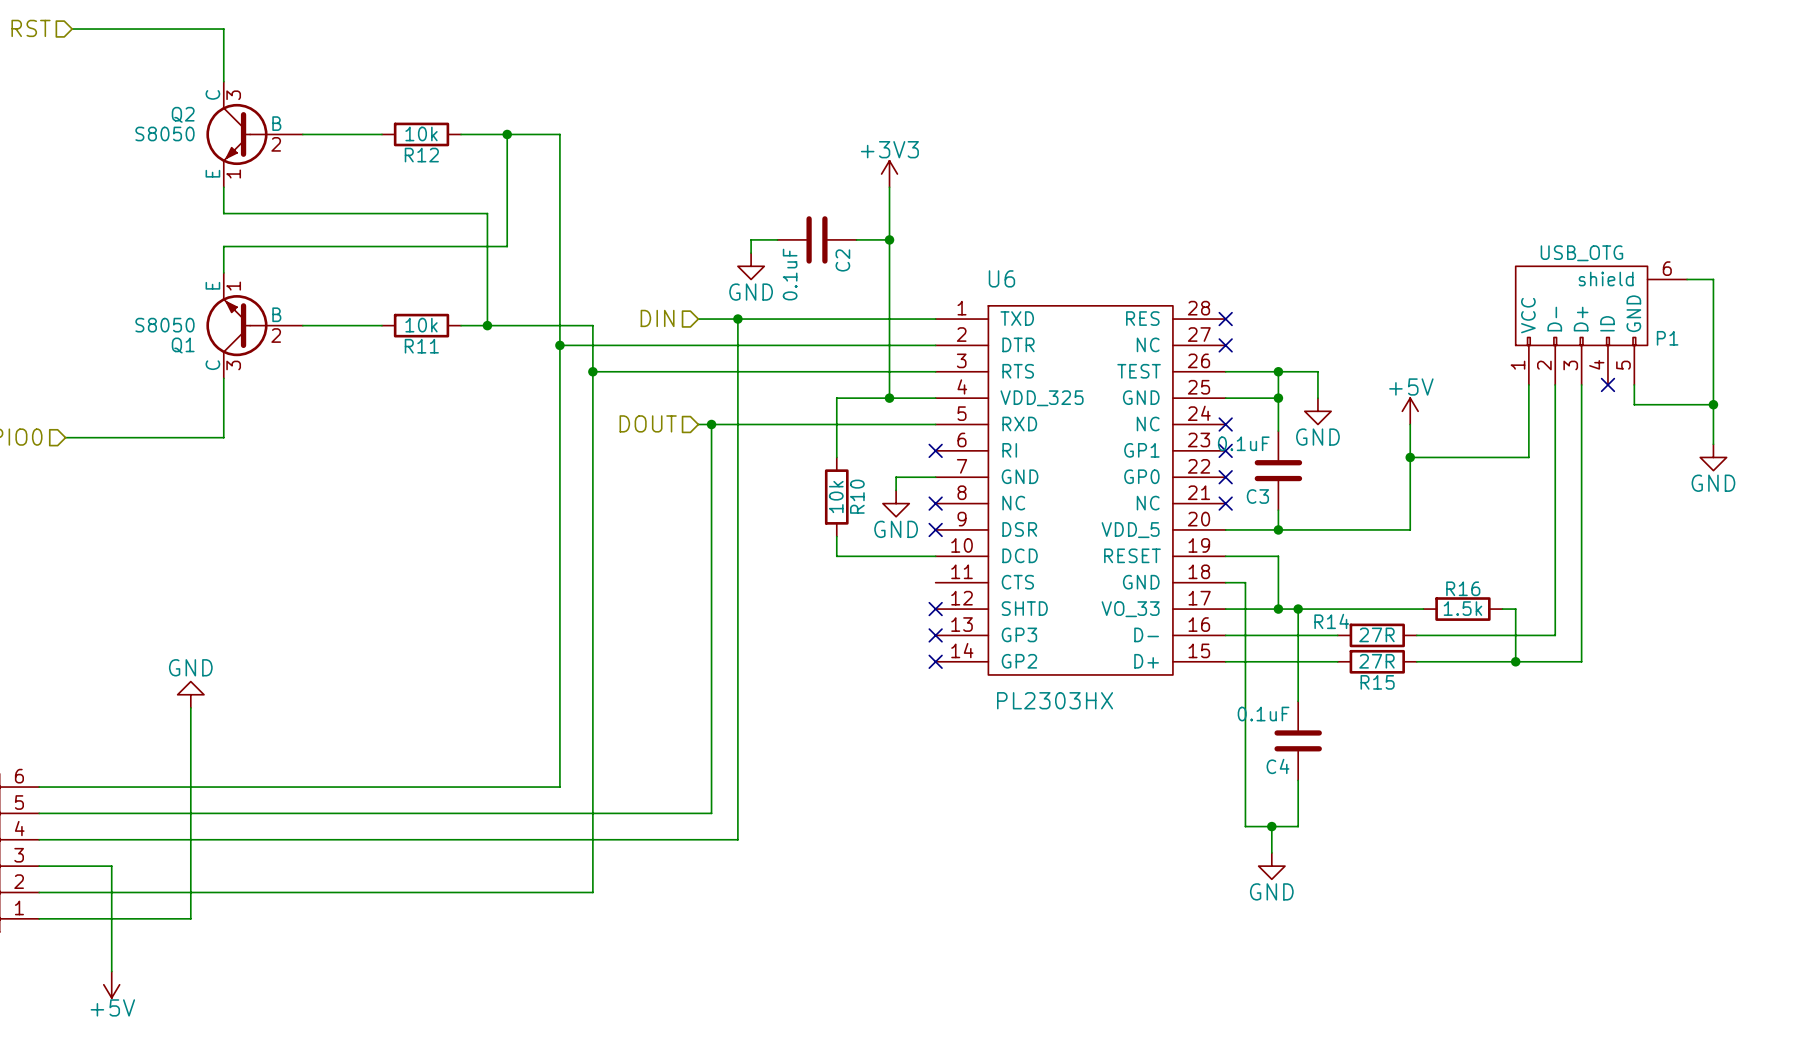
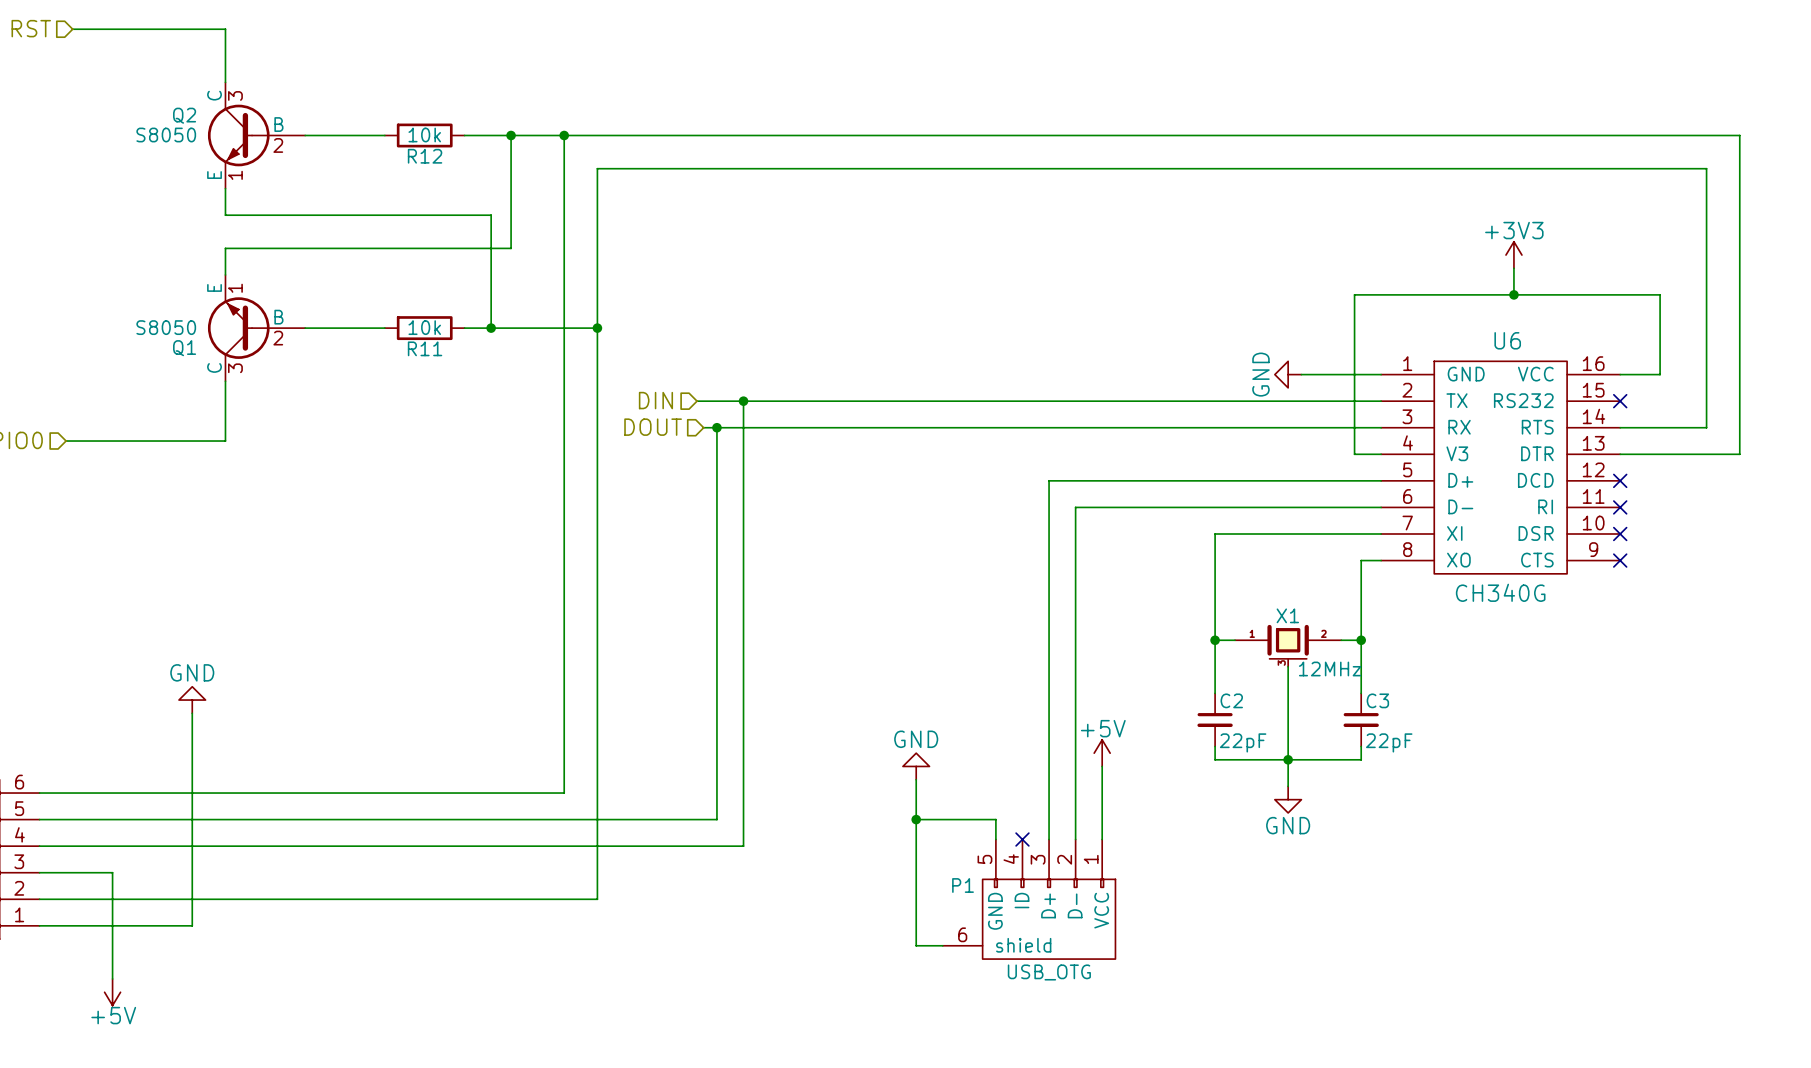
wire: none -> (564, 135) (1739, 135) (1739, 454) (1620, 454)
junction: none -> (564, 135)
power symbol: +3V3 (889, 174) -> none
wire: (889, 187) (889, 398) -> none
C2 symbol: [777, 216, 857, 264] -> [1197, 693, 1233, 747]
wire: (777, 239) (751, 239) (751, 253) -> none
wire: (856, 239) (889, 239) -> none
junction: (889, 239) -> none
power symbol: none -> +3V3 (1513, 255)
C2 name position: C2 (842, 260) -> C2 (1231, 700)
power symbol: GND (751, 266) -> none
wire: none -> (1513, 268) (1513, 294)
C2 value: 0.1uF (790, 274) -> 22pF (1243, 742)
U6 name position: U6 (1001, 278) -> U6 (1507, 340)
wire: (1687, 279) (1713, 279) (1713, 444) -> none
junction: none -> (1513, 294)
U6 symbol: [935, 305, 1226, 675] -> [1381, 361, 1621, 574]
P1 rotation: 0° (1581, 305) -> 180° (1049, 919)
hierarchical label position: DIN (657, 318) -> DIN (655, 400)
wire: (698, 319) (935, 319) -> none
wire: (737, 319) (737, 398) -> none
junction: (737, 319) -> none
no-connect mark: (1225, 319) -> none
wire: none -> (597, 328) (597, 168) (1706, 168) (1706, 427) (1620, 427)
junction: none -> (597, 328)
P1 position: (1601, 325) -> (1029, 899)
wire: (559, 345) (935, 345) -> none
junction: (559, 345) -> none
no-connect mark: (1225, 345) -> none
wire: (592, 371) (935, 371) -> none
junction: (592, 371) -> none
wire: (1225, 371) (1291, 371) -> none
wire: (1278, 371) (1278, 431) -> none
junction: (1278, 371) -> none
wire: (1317, 371) (1317, 398) -> (1327, 374) (1381, 374)
wire: none -> (1620, 374) (1660, 374) (1660, 294) (1354, 294) (1354, 454) (1381, 454)
wire: (1528, 384) (1528, 457) (1410, 457) -> none
wire: (1555, 384) (1555, 635) (1416, 635) -> none
wire: (1581, 384) (1581, 661) (1416, 661) -> none
no-connect mark position: (1607, 384) -> (1620, 401)
wire: (1634, 384) (1634, 404) (1713, 404) -> none
junction: none -> (743, 401)
wire: (836, 398) (836, 457) -> (843, 401) (697, 401)
junction: (889, 398) -> none
wire: none -> (942, 401) (1235, 401)
wire: none -> (1288, 401) (1381, 401)
junction: (1278, 398) -> none
junction: (1713, 404) -> none
power symbol rotation: 0° (1317, 411) -> 90° clockwise (1288, 374)
power symbol position: GND (1317, 411) -> GND (1288, 374)
power symbol: +5V (1410, 411) -> none
wire: none -> (942, 427) (1381, 427)
no-connect mark: (1225, 424) -> none
wire: (1410, 424) (1410, 529) (1370, 529) -> none
C3 symbol: [1254, 431, 1303, 511] -> [1343, 693, 1379, 747]
C3 value: 0.1uF (1243, 443) -> 22pF (1389, 742)
no-connect mark: (935, 450) -> none
no-connect mark: (1225, 450) -> none
junction: (1410, 457) -> none
power symbol: GND (1713, 457) -> none
wire: (935, 477) (896, 477) (896, 490) -> none
no-connect mark: (1225, 477) -> none
wire: none -> (1381, 480) (1049, 480) (1049, 839)
no-connect mark: none -> (1620, 480)
C3 name position: C3 (1257, 496) -> C3 (1377, 700)
R10: 10k (836, 497) -> none
power symbol: GND (896, 503) -> none
no-connect mark: (935, 503) -> none
no-connect mark: (1225, 503) -> none
wire: none -> (1381, 507) (1075, 507) (1075, 839)
no-connect mark: none -> (1620, 507)
wire: (1278, 510) (1278, 529) -> none
no-connect mark: (935, 529) -> none
wire: none -> (1235, 533) (1215, 533) (1215, 693)
junction: (1278, 529) -> none
no-connect mark: none -> (1620, 533)
wire: (836, 536) (836, 556) (935, 556) -> none
wire: (1225, 556) (1278, 556) (1278, 609) -> none
wire: none -> (1381, 560) (1361, 560) (1361, 693)
no-connect mark: none -> (1620, 560)
wire: (1225, 582) (1245, 582) (1245, 826) (1298, 826) (1298, 780) -> none
no-connect mark: (935, 609) -> none
wire: (1225, 609) (1423, 609) -> none
junction: (1278, 609) -> none
wire: (1298, 609) (1298, 701) -> none
junction: (1298, 609) -> none
R16: 1.5k (1462, 609) -> none
wire: (1502, 609) (1515, 609) (1515, 661) -> none
no-connect mark: (935, 635) -> none
junction: none -> (1215, 640)
junction: none -> (1361, 640)
R14: 27R (1377, 635) -> none
X1: none -> 12MHz (1288, 645)
no-connect mark: (935, 661) -> none
wire: (1225, 661) (1337, 661) -> none
wire: none -> (1288, 666) (1288, 786)
R15: 27R (1377, 661) -> none
junction: (1515, 661) -> none
U6 value: PL2303HX (1055, 700) -> CH340G (1500, 592)
wire: none -> (1215, 746) (1215, 759) (1361, 759) (1361, 746)
C4: 0.1uF (1298, 740) -> none
power symbol: none -> +5V (1102, 753)
junction: none -> (1288, 759)
power symbol: none -> GND (916, 766)
wire: none -> (1102, 766) (1102, 839)
wire: none -> (916, 779) (916, 945) (942, 945)
wire: none -> (916, 819) (995, 819) (995, 839)
junction: none -> (916, 819)
wire: (1271, 826) (1271, 852) -> none
junction: (1271, 826) -> none
no-connect mark: none -> (1022, 839)
power symbol position: GND (1271, 866) -> GND (1288, 799)

